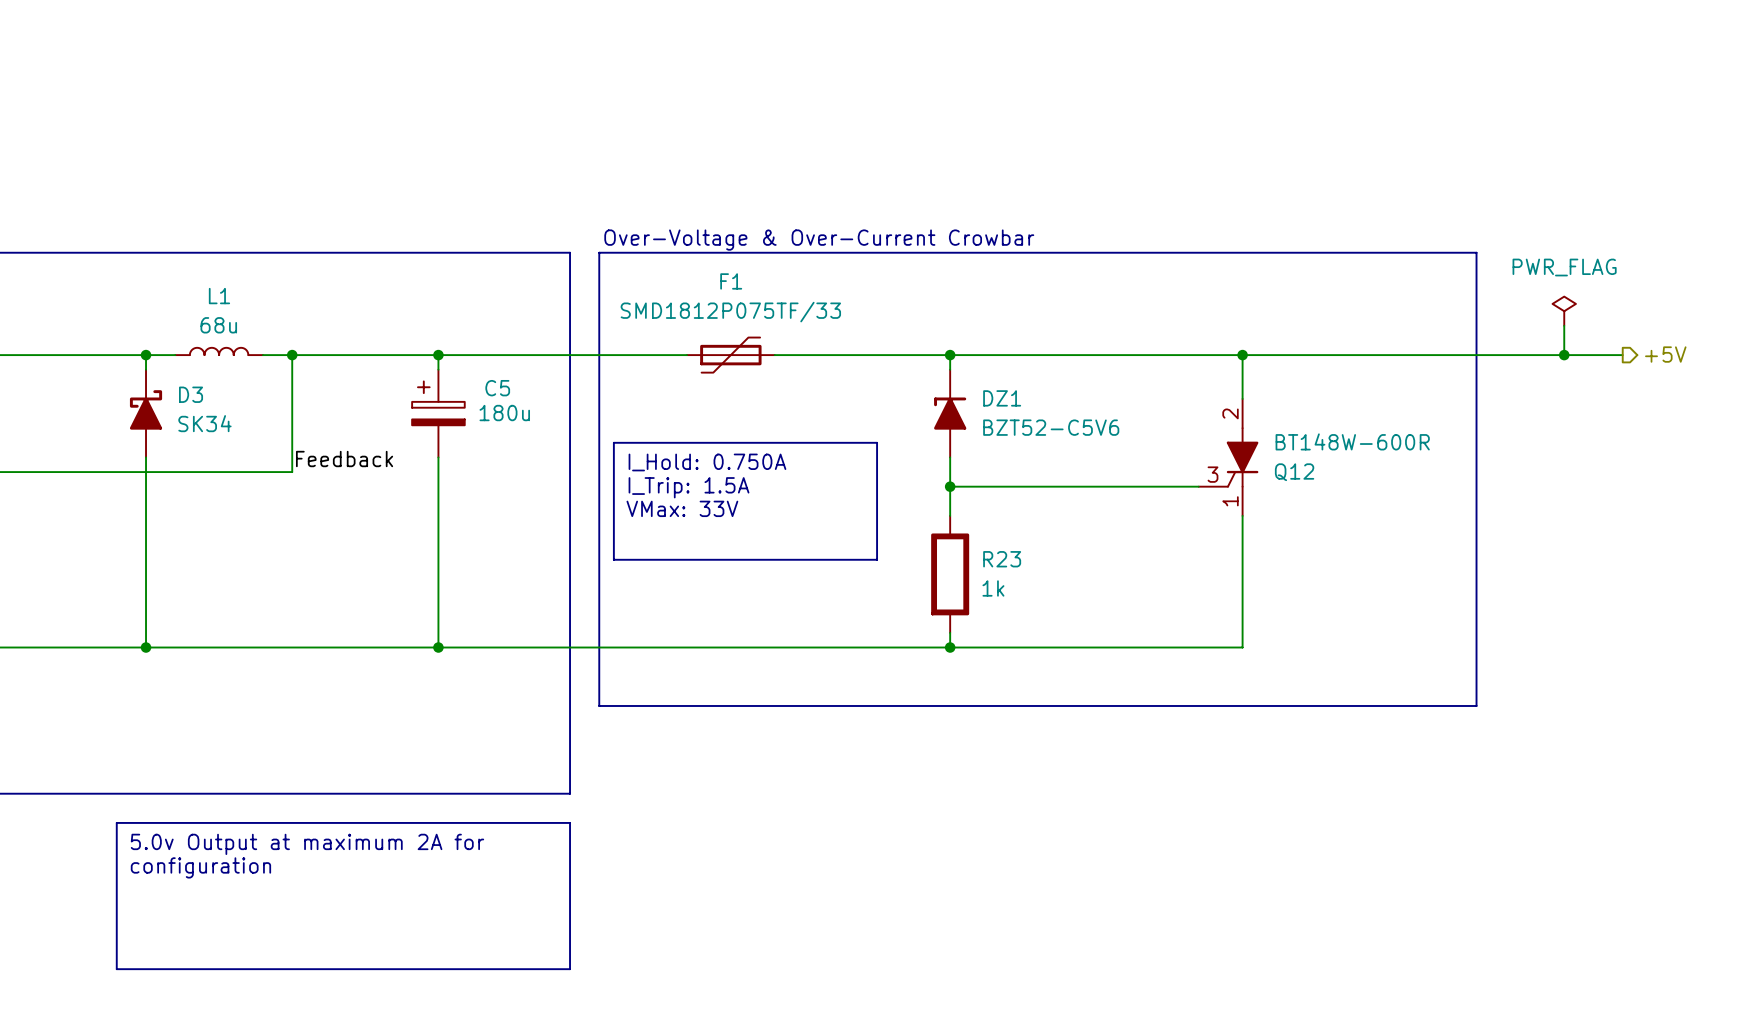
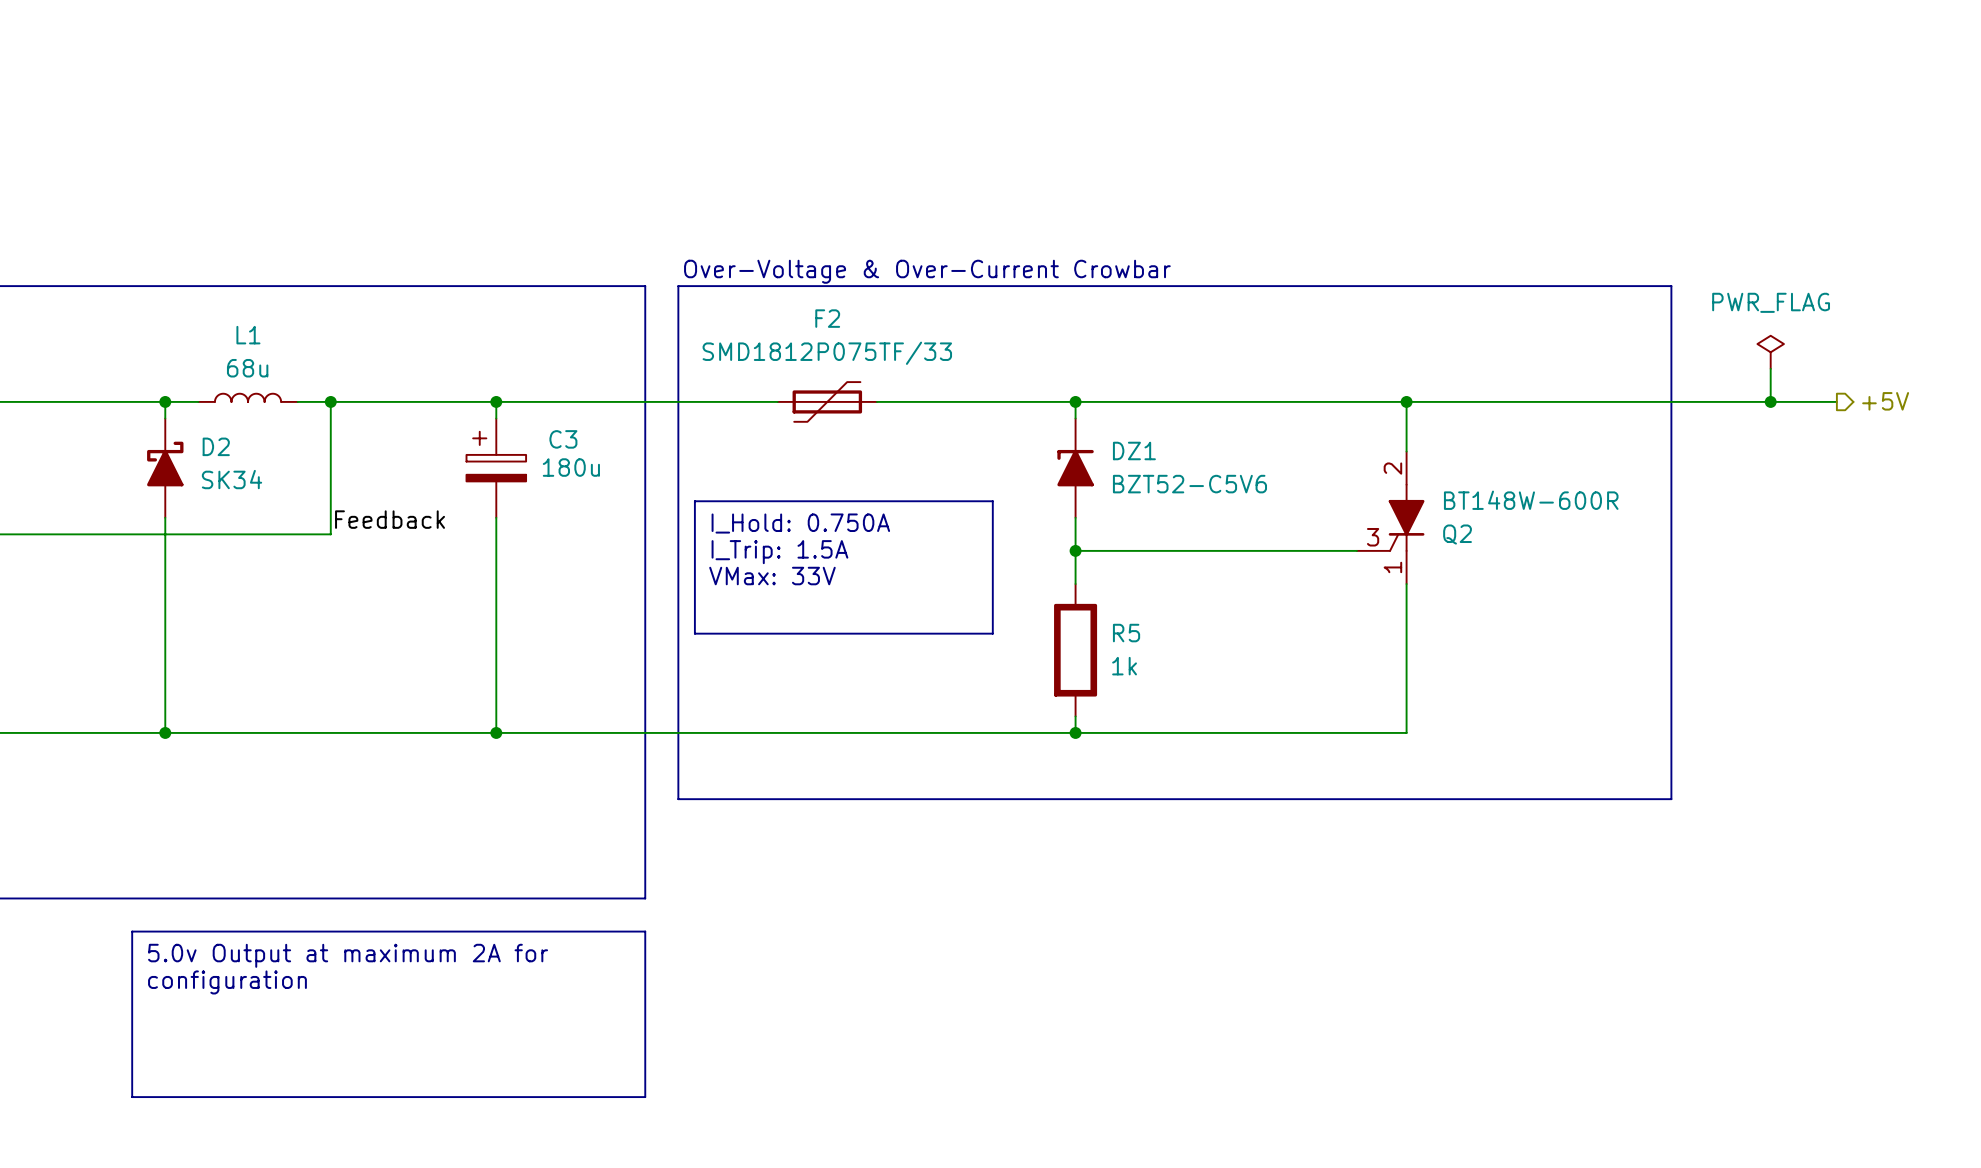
F1 name: F1 (731, 281) -> F2 (827, 318)
C5 name: C5 (497, 388) -> C3 (563, 439)
D3 name: D3 (191, 394) -> D2 (216, 446)
Q12 name: Q12 (1294, 472) -> Q2 (1457, 534)
R23 name: R23 (1002, 559) -> R5 (1126, 633)

